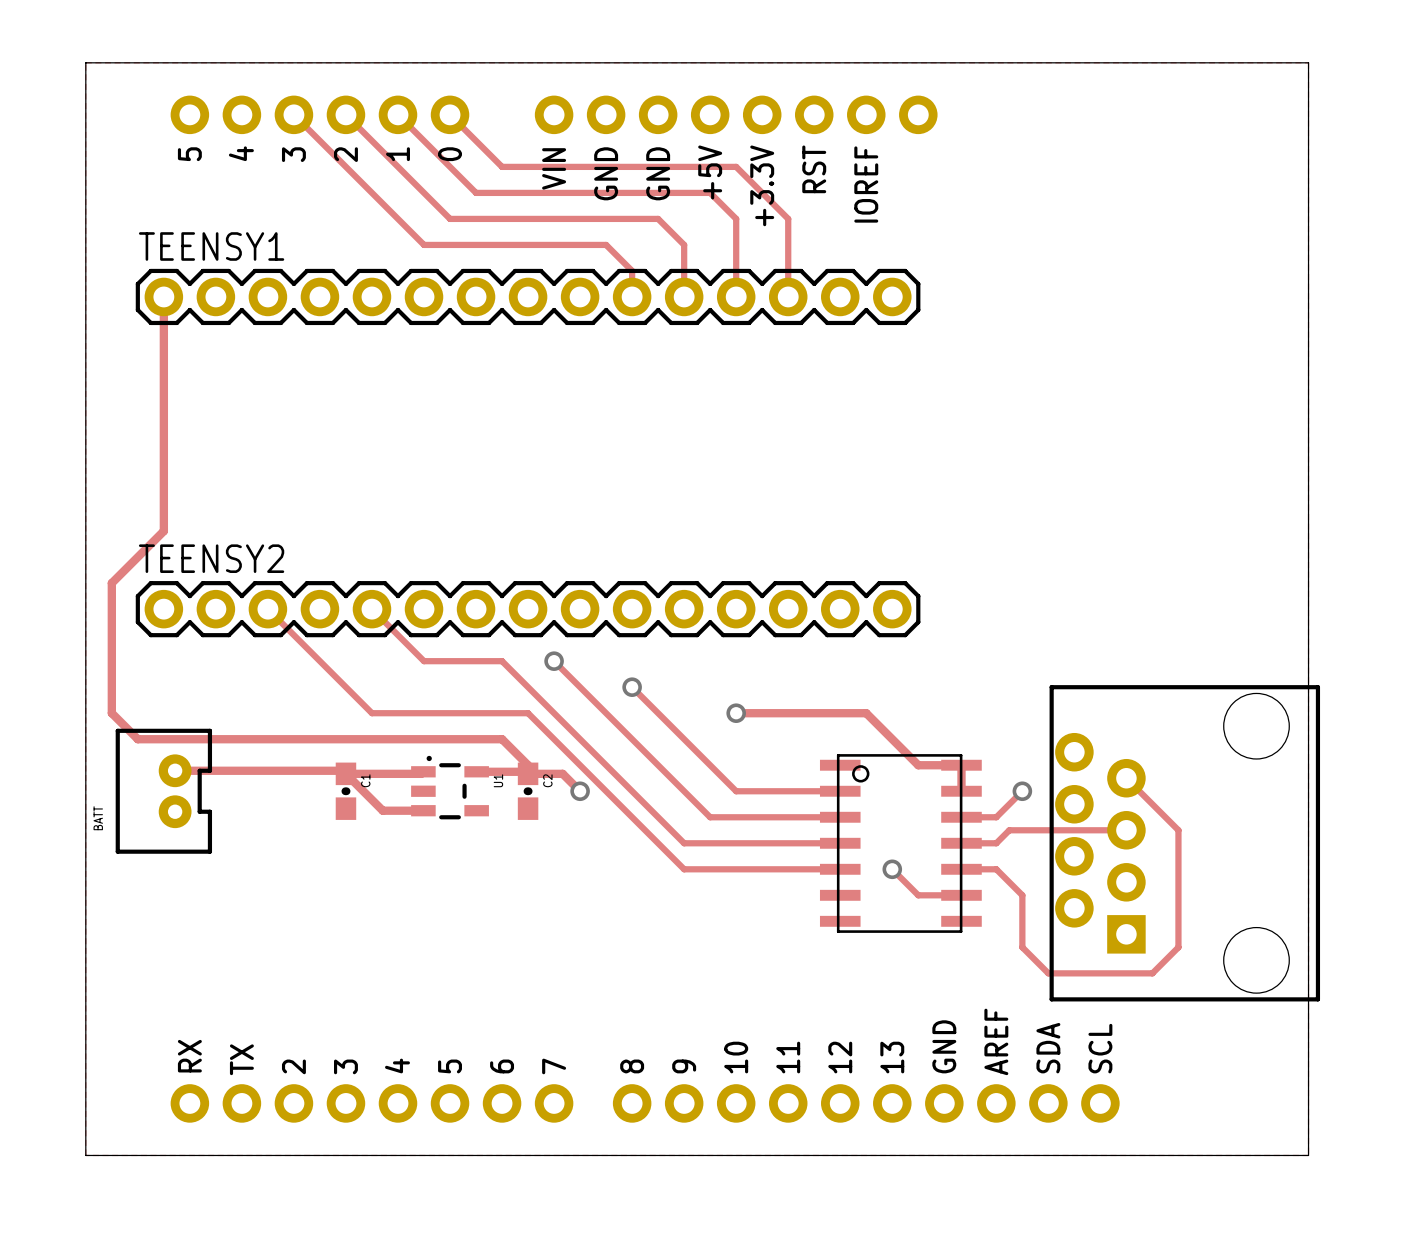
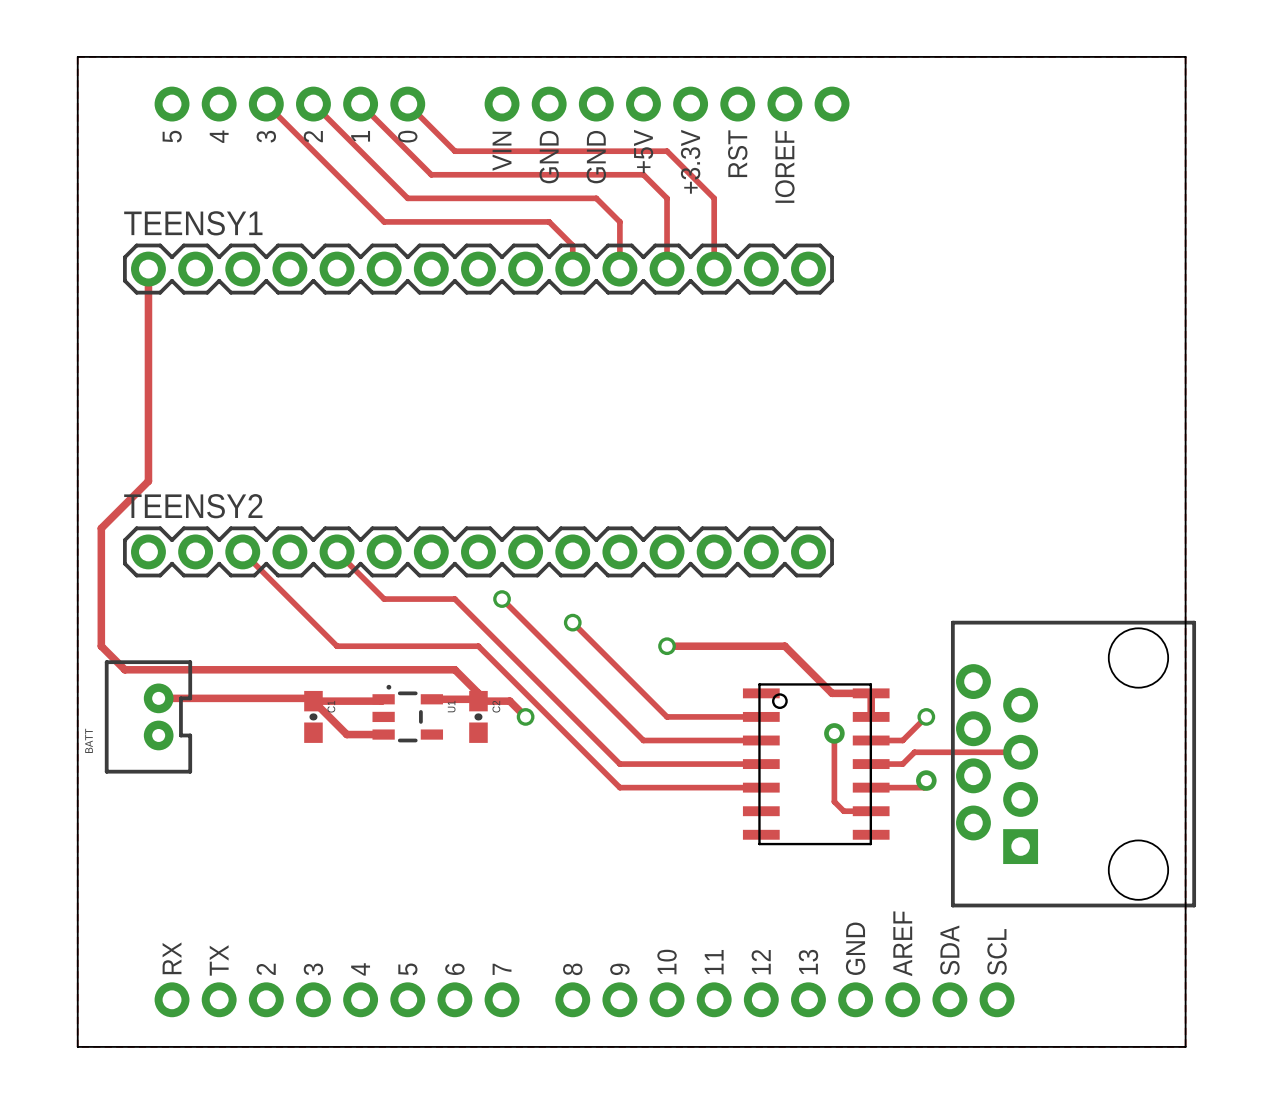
track: (1126, 778) (1178, 830) (1178, 947) (1152, 973) (1048, 973) (1022, 947) (1022, 895) (996, 869) -> (926, 780) (923, 787) (902, 787)
via: none -> (834, 733)
via: none -> (926, 780)
track: (892, 869) (918, 895) (931, 895) -> (834, 733) (834, 801) (843, 811)
via: (892, 869) -> none

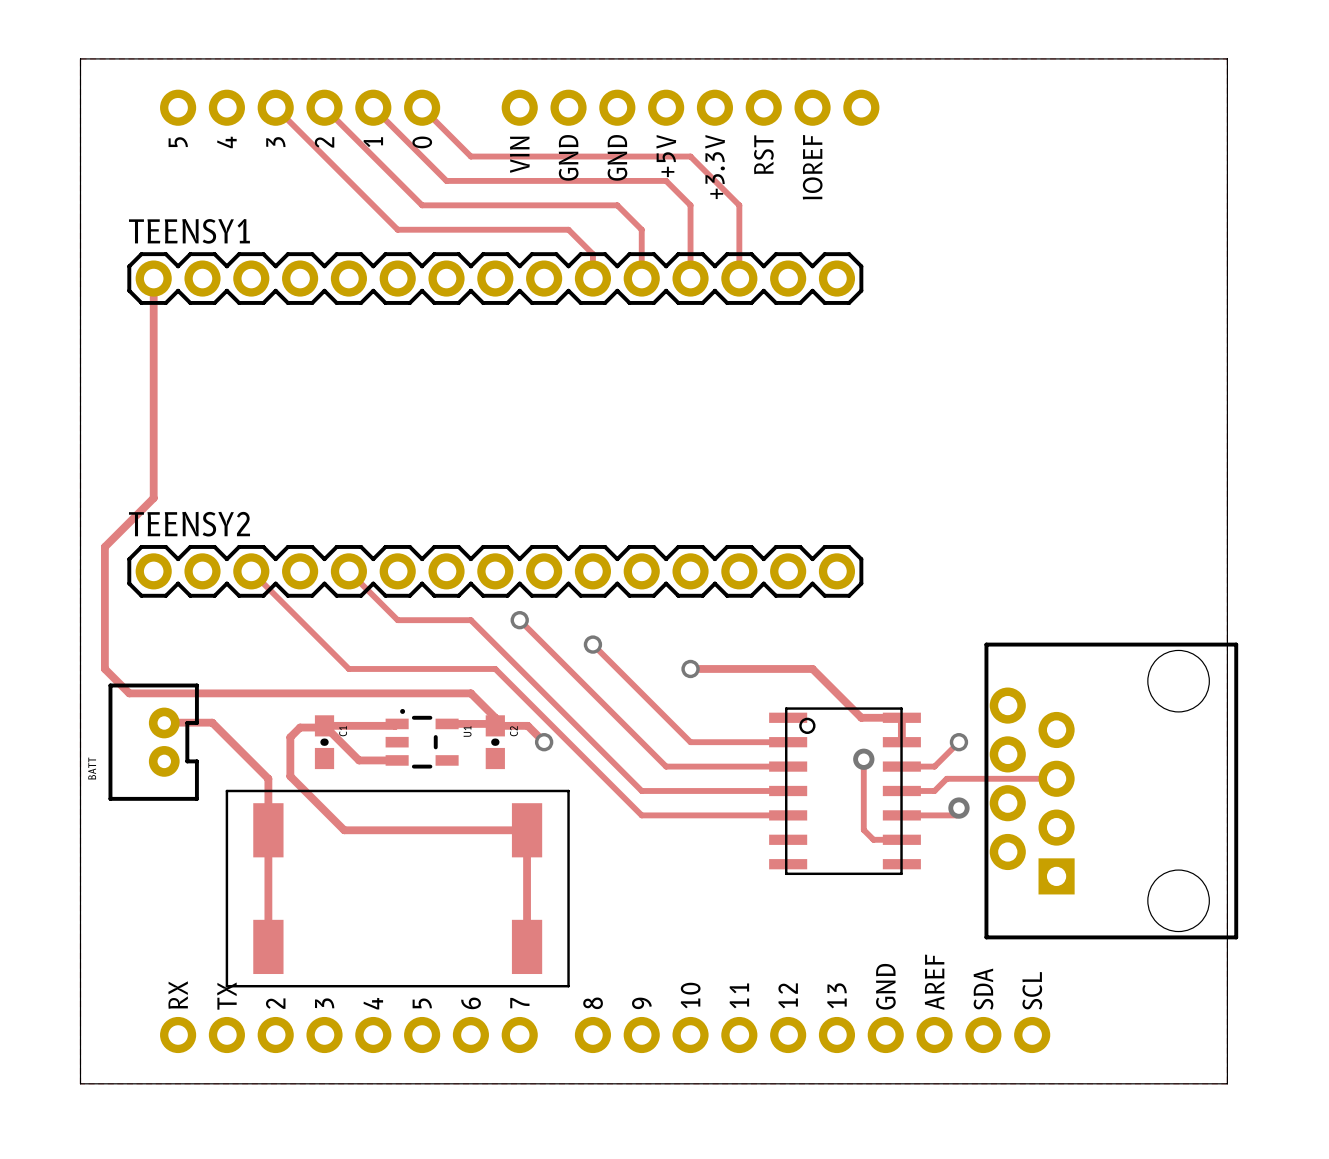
track: (158, 698) (310, 698) -> (164, 722) (212, 722) (268, 778) (268, 946)
track: none -> (324, 725) (322, 727) (300, 727) (290, 737) (290, 776) (344, 830) (527, 830) (527, 946)
part: none -> (397, 888)

